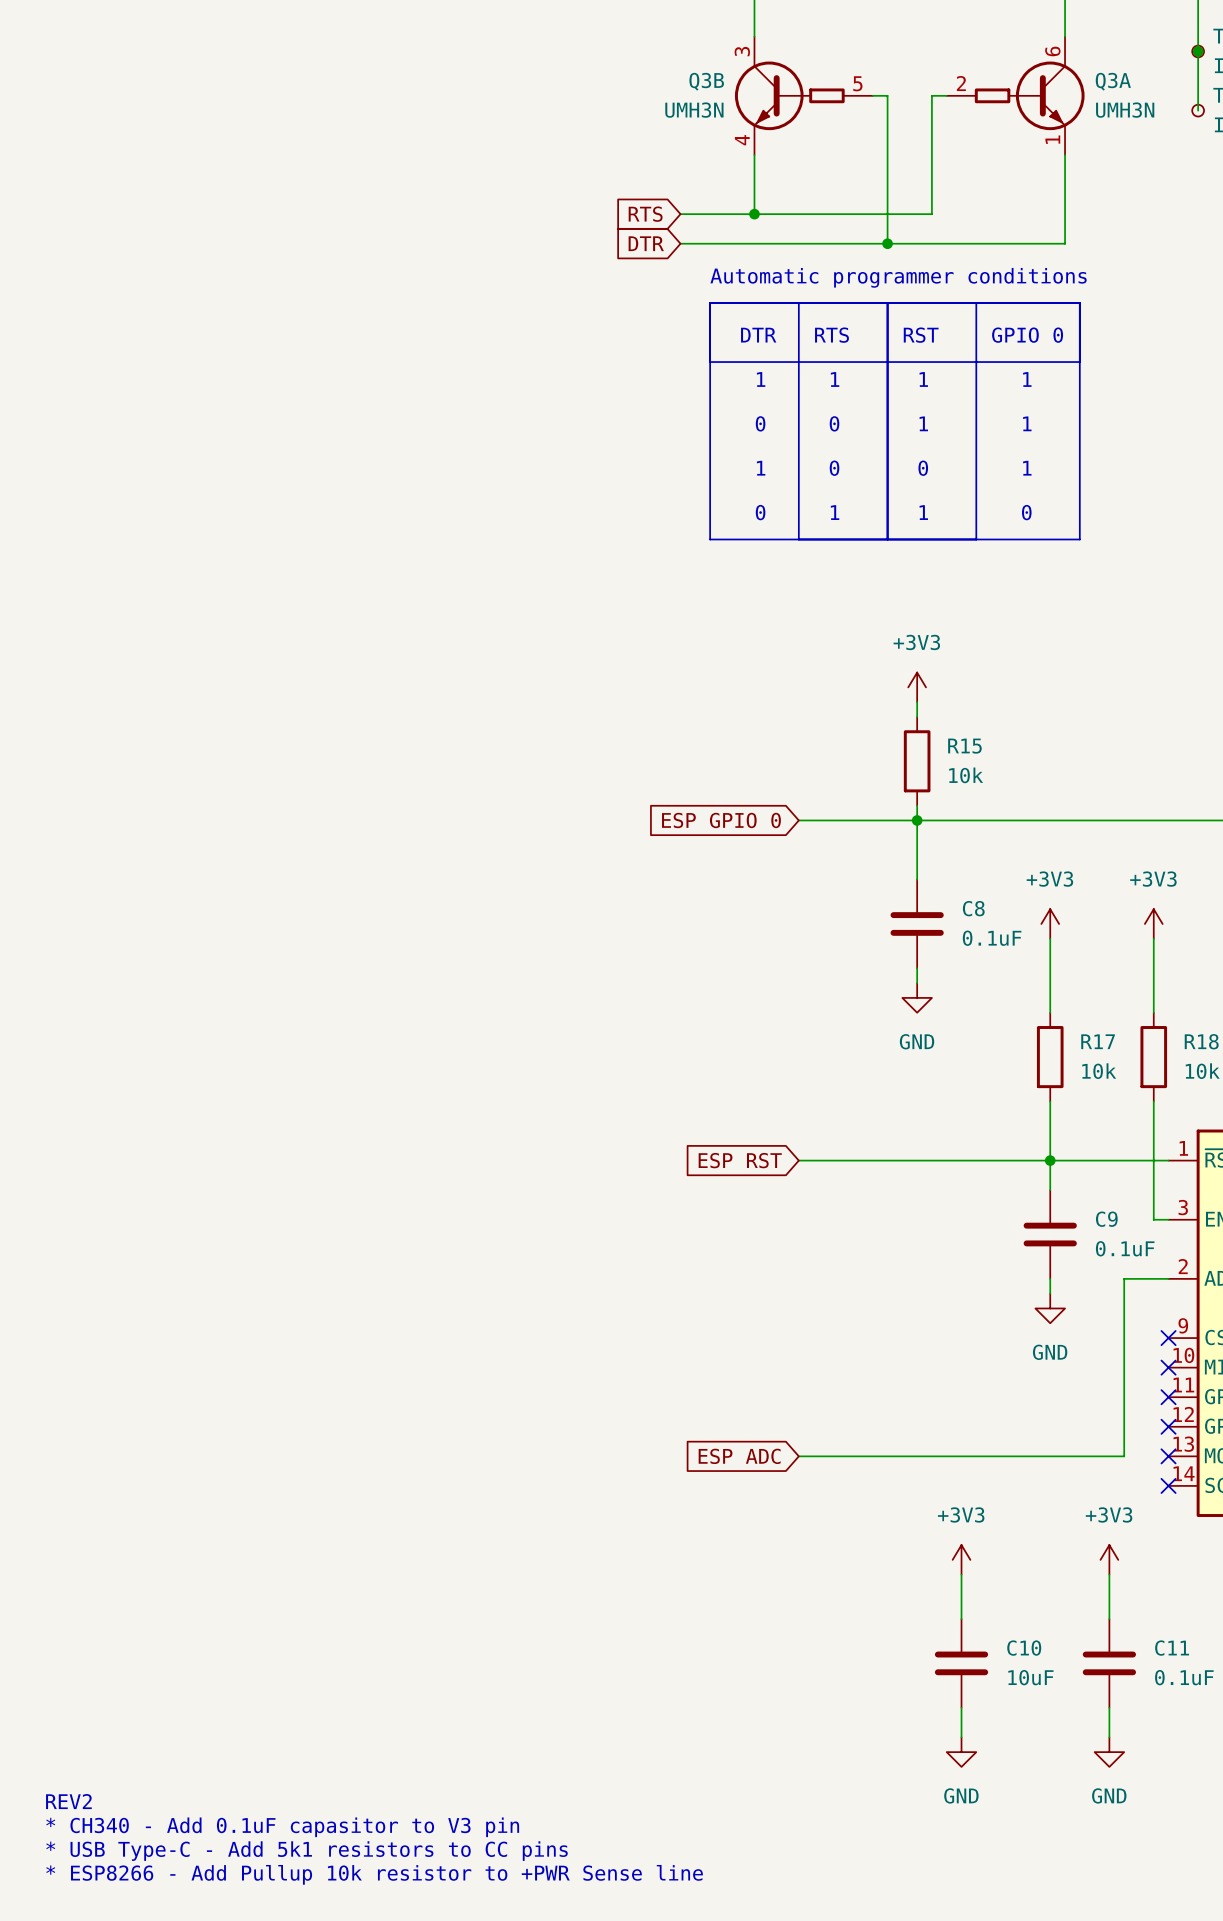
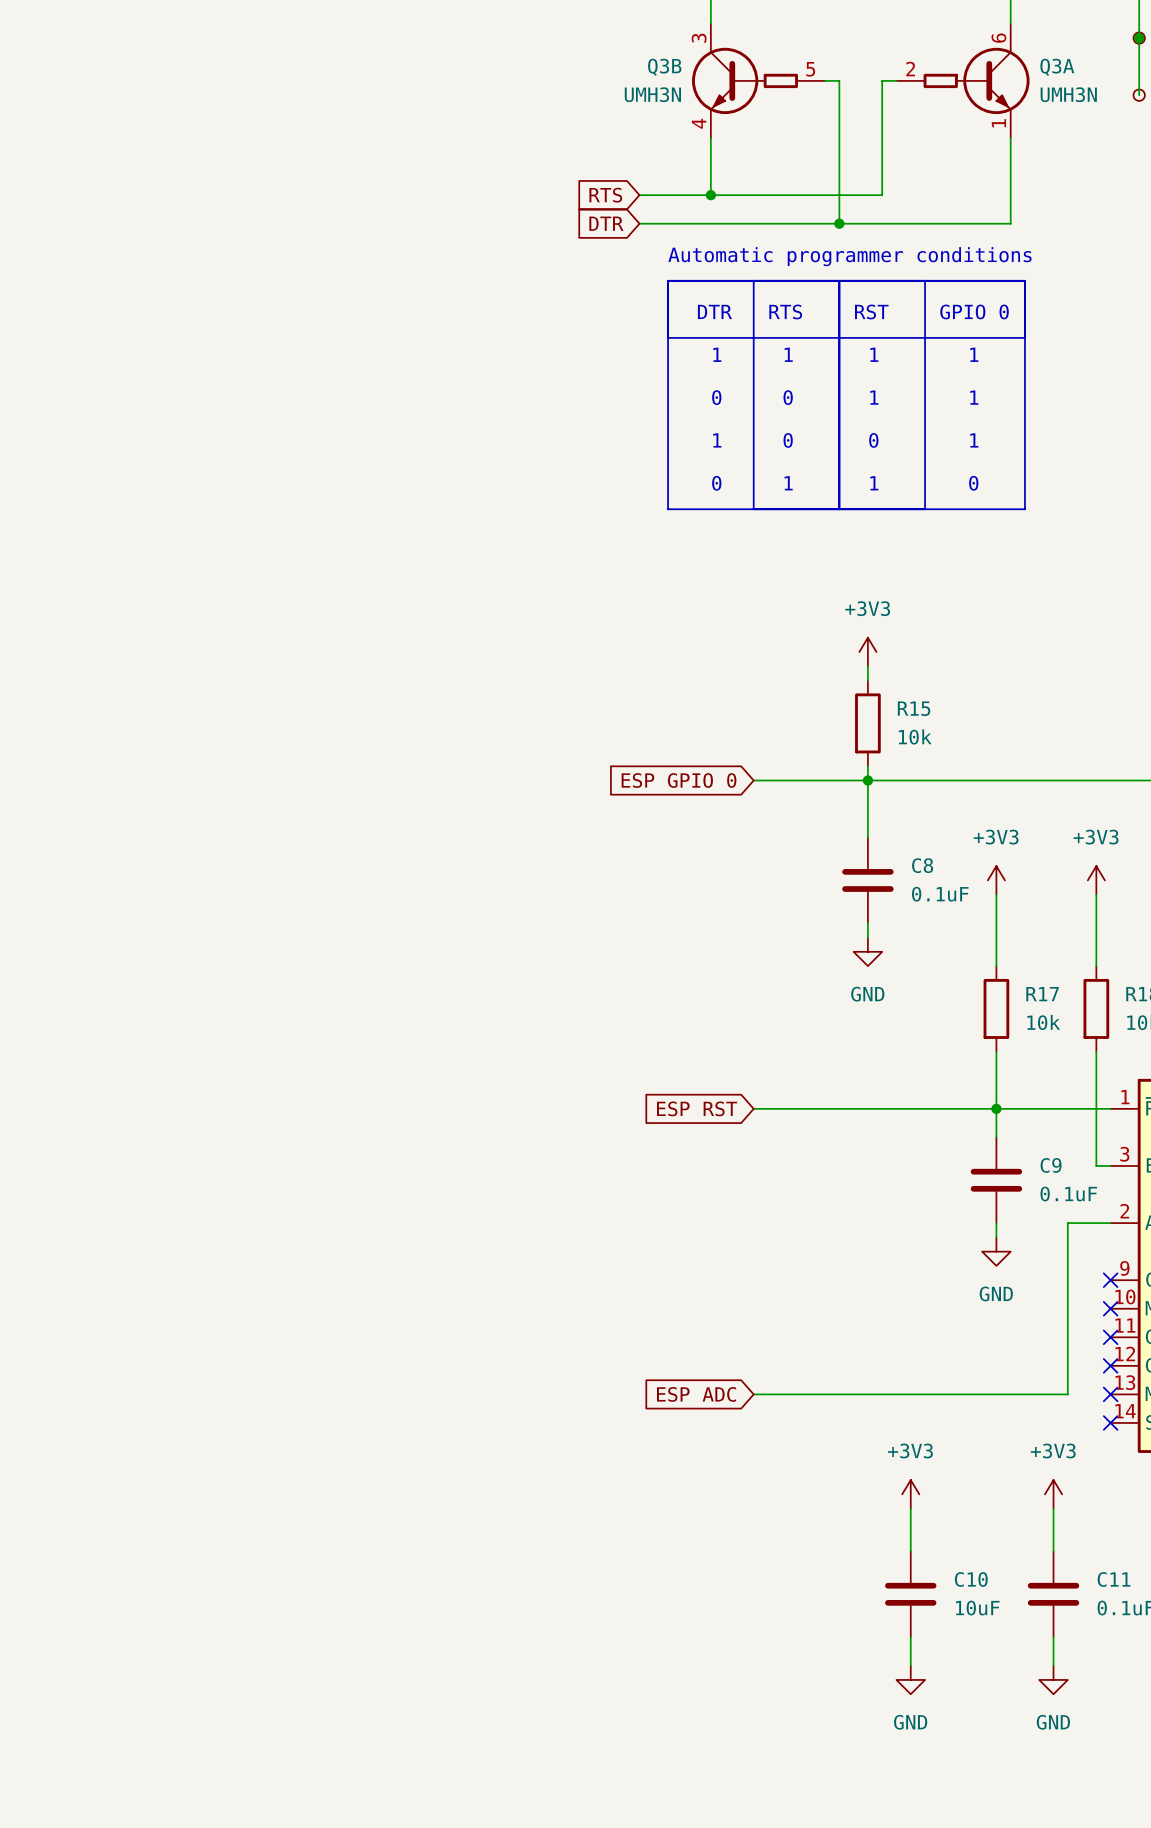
text: REV2 (68, 1801) -> none
text: * CH340 - Add 0.1uF capasitor to V3 pin (282, 1827) -> none
text: * USB Type-C - Add 5k1 resistors to CC pins (307, 1851) -> none
text: * ESP8266 - Add Pullup 10k resistor to +PWR Sense line (374, 1874) -> none

